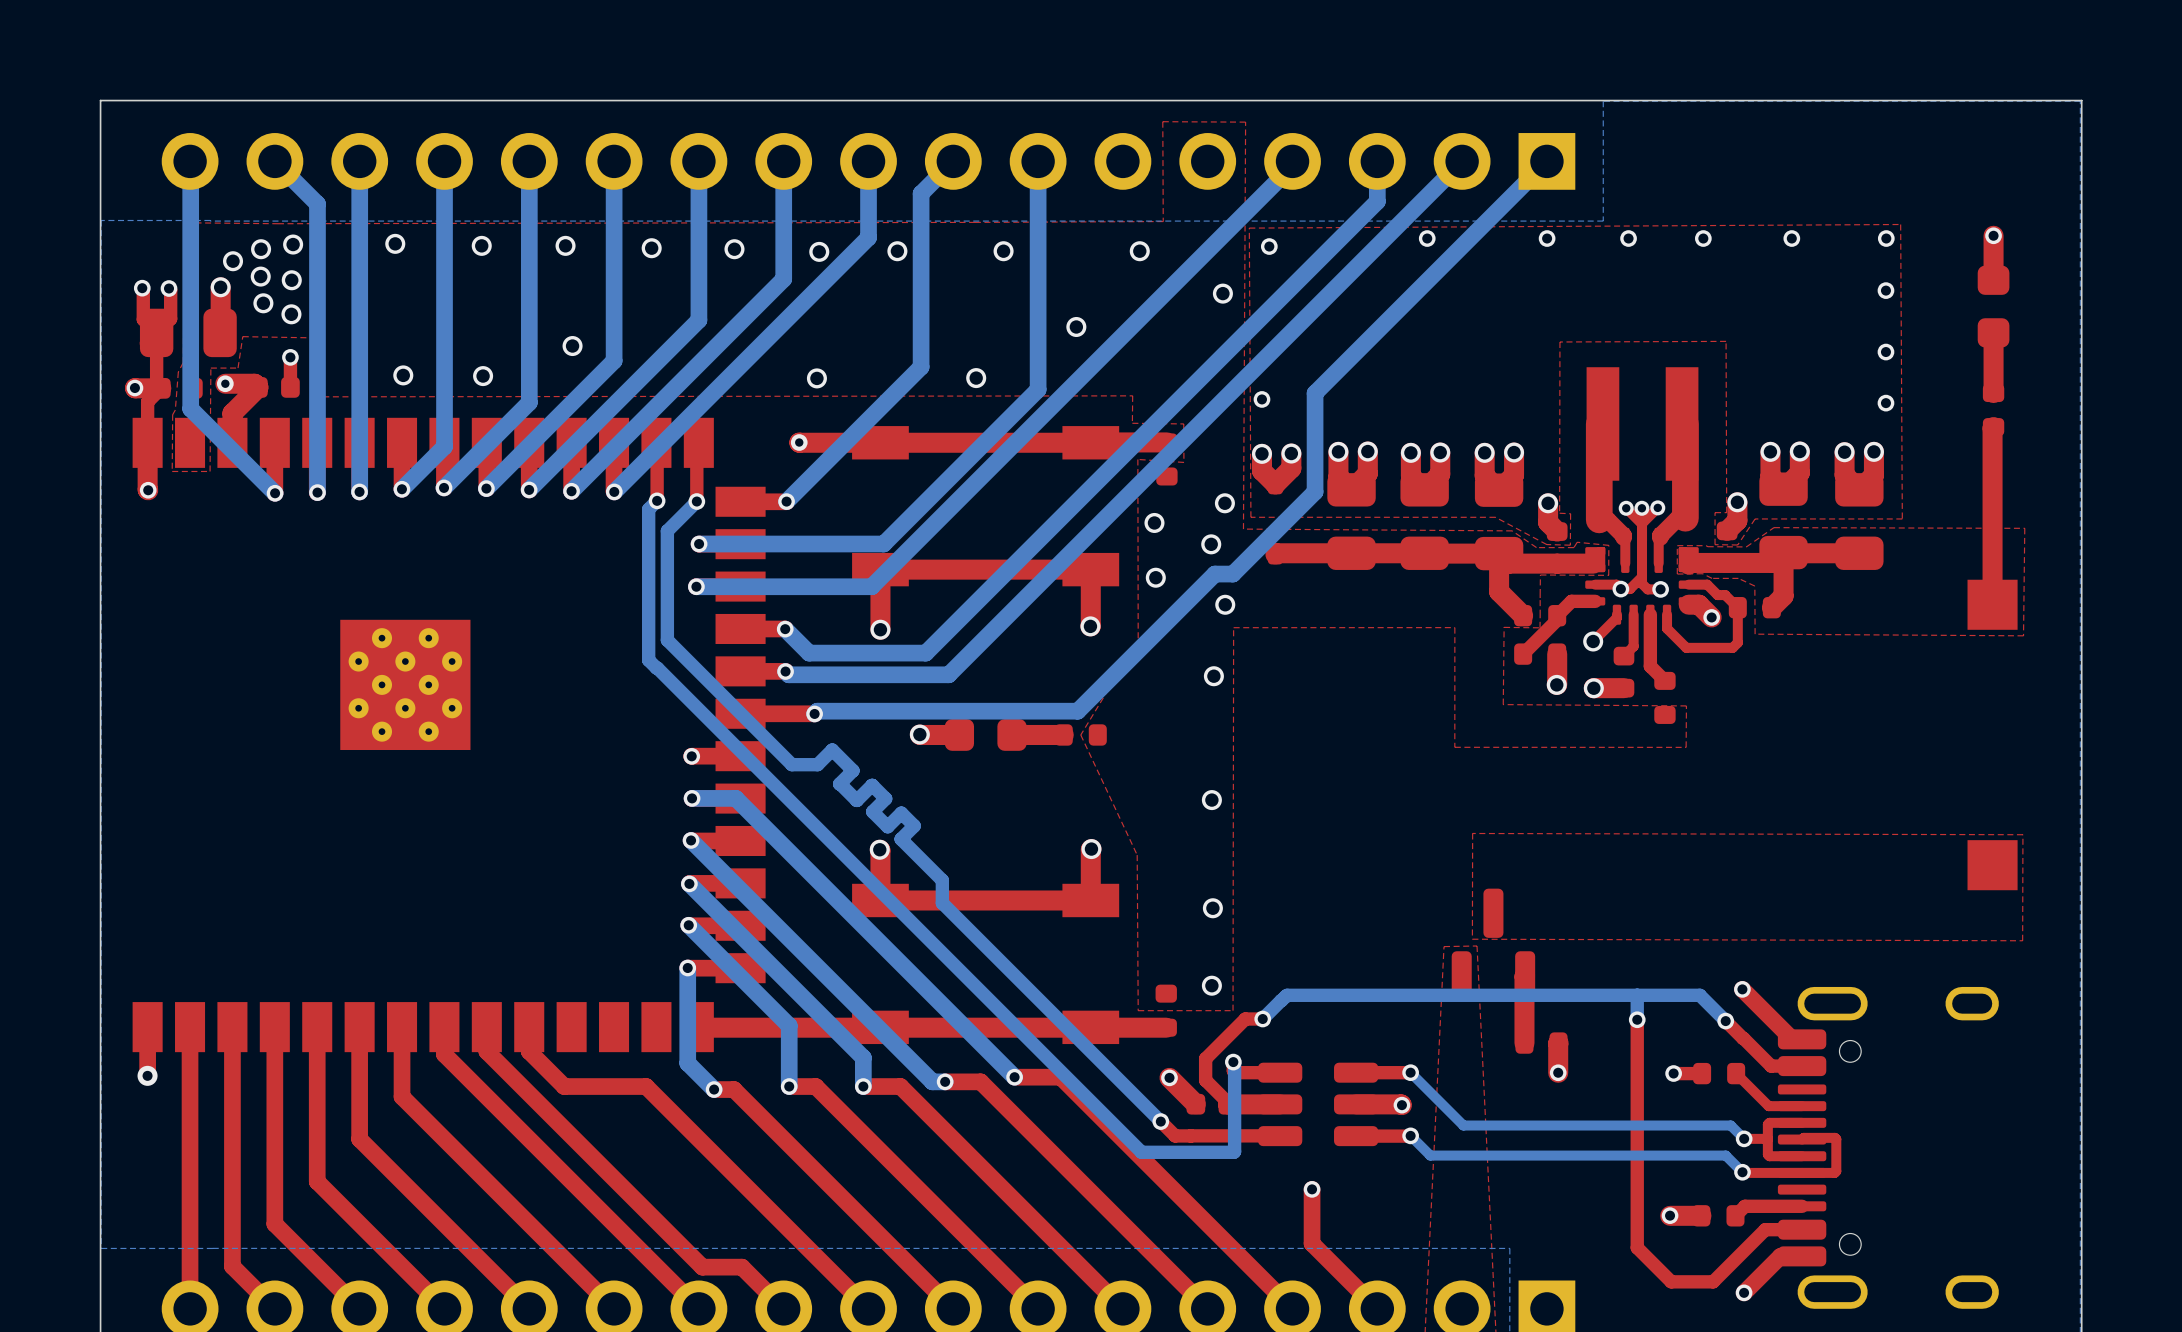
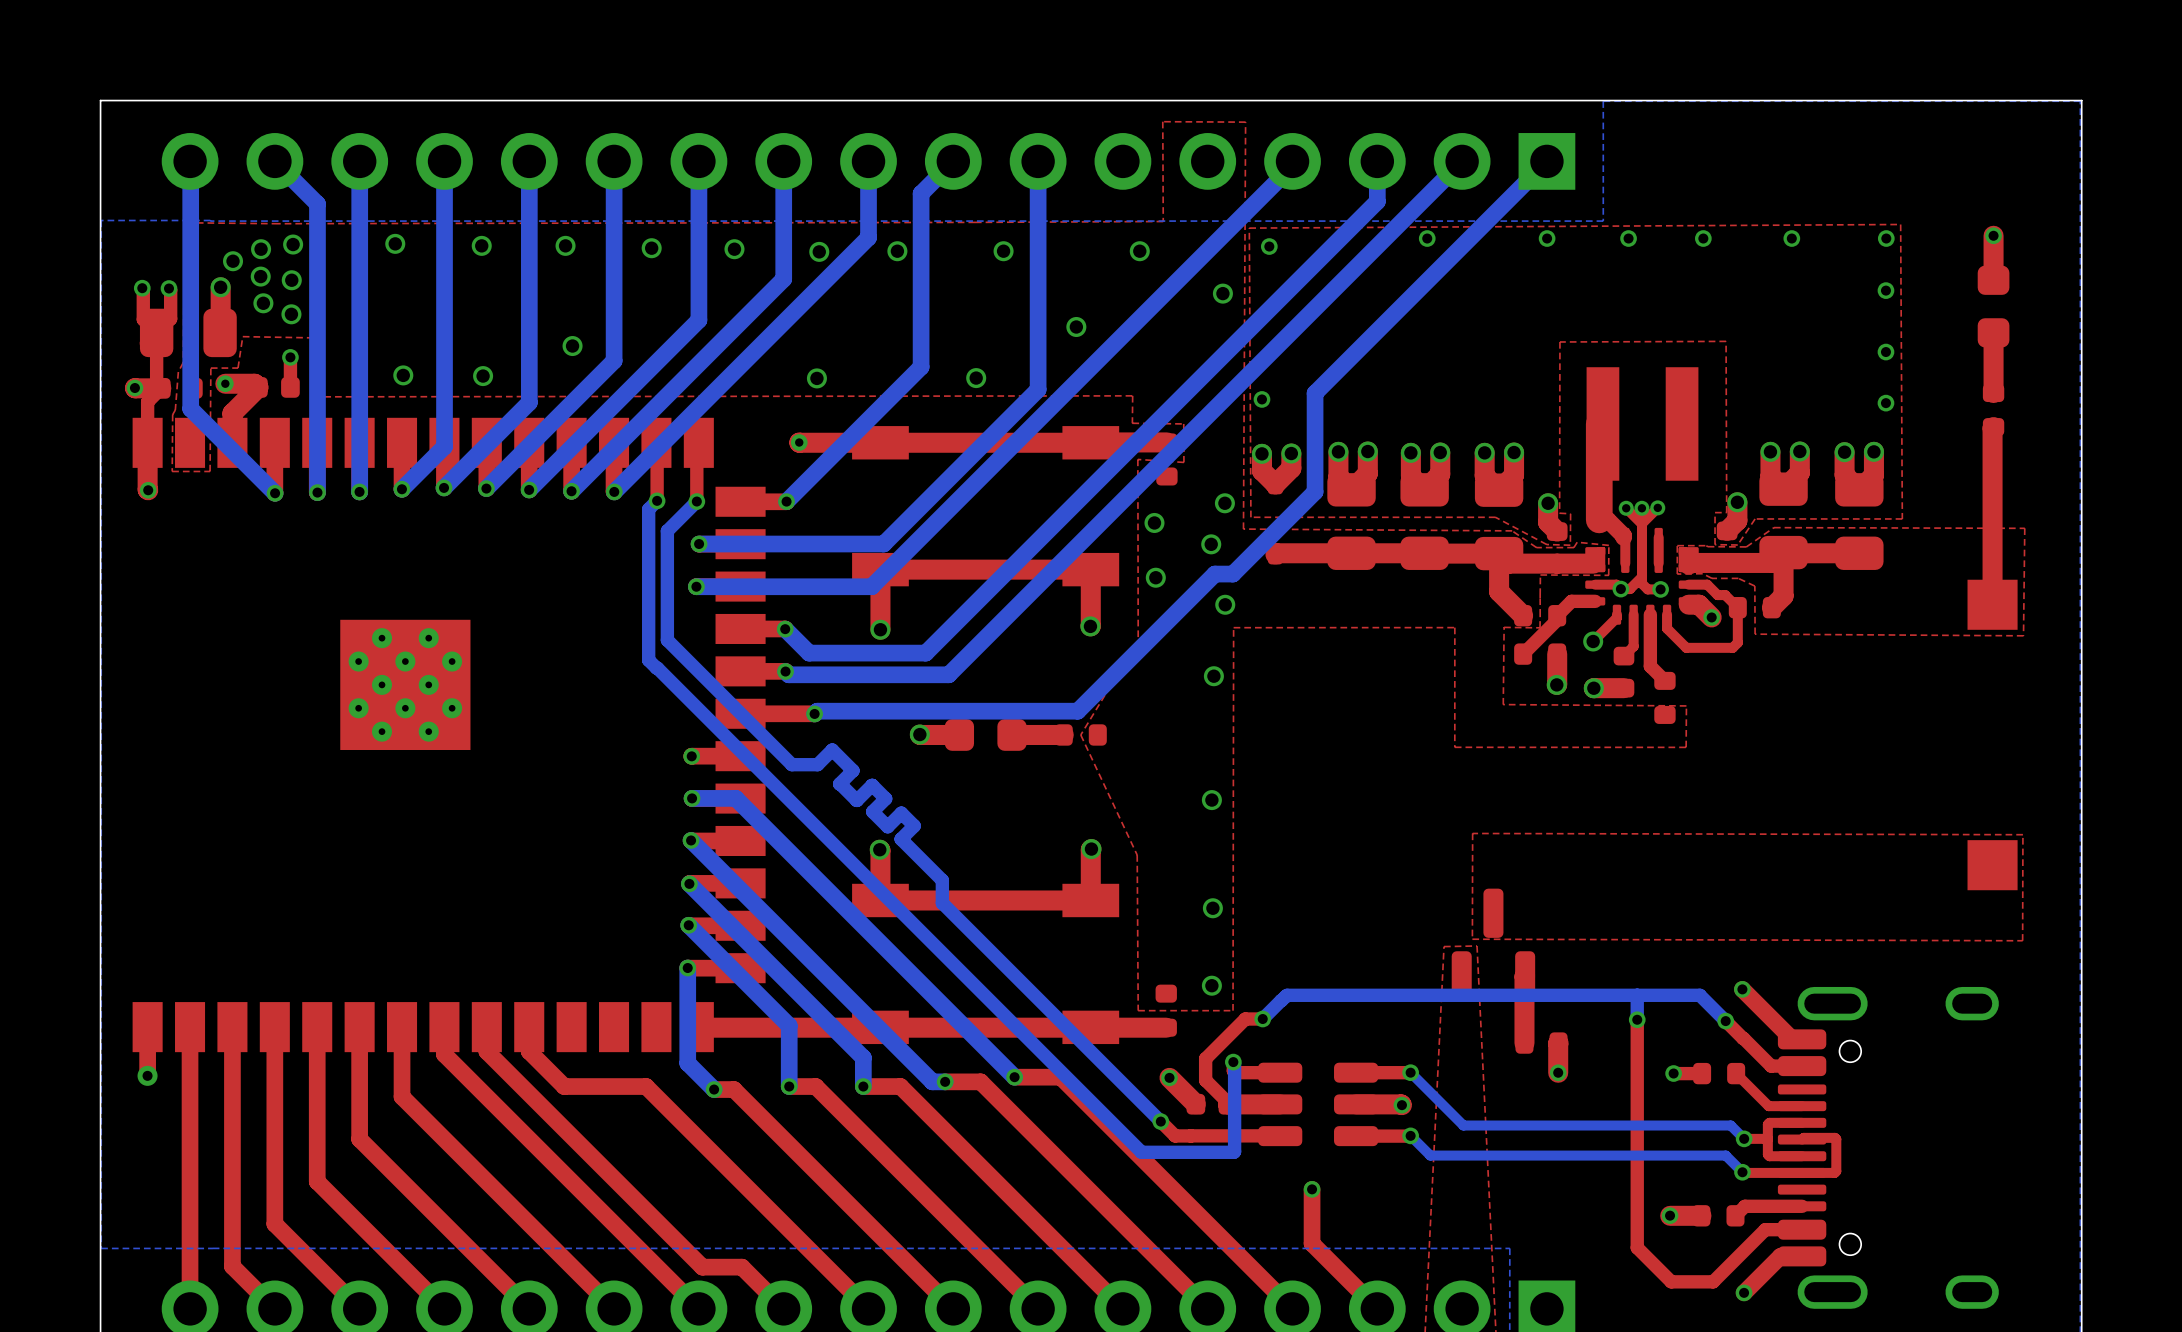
top track: (1685, 423) (1685, 518) (1677, 518) (1660, 537) -> none

